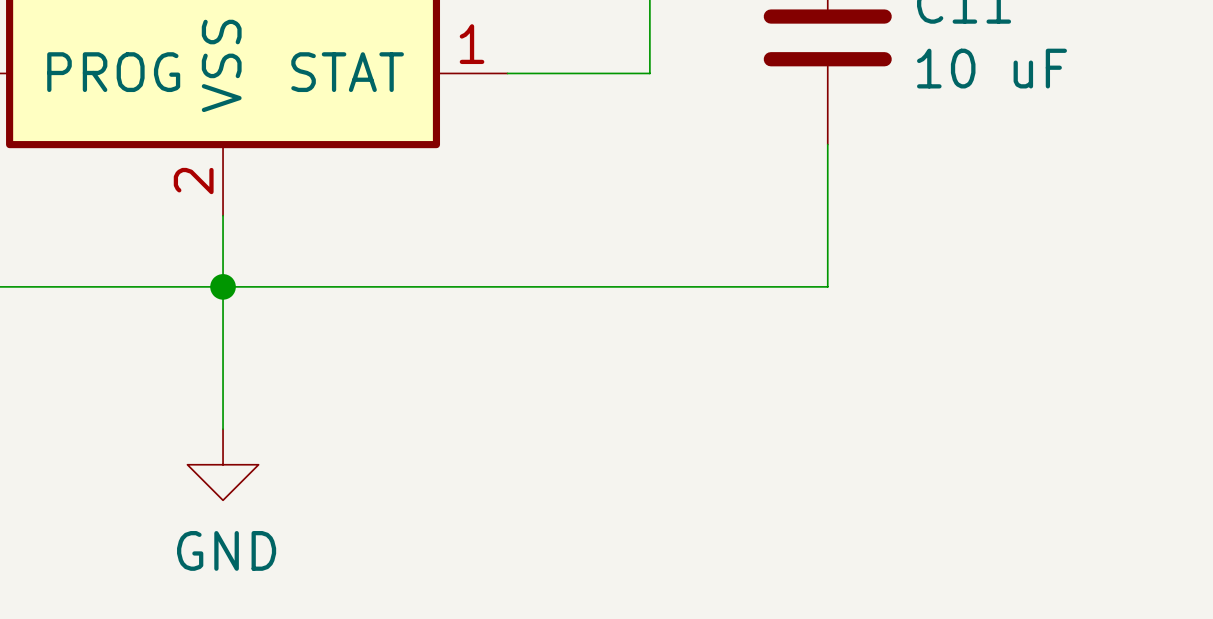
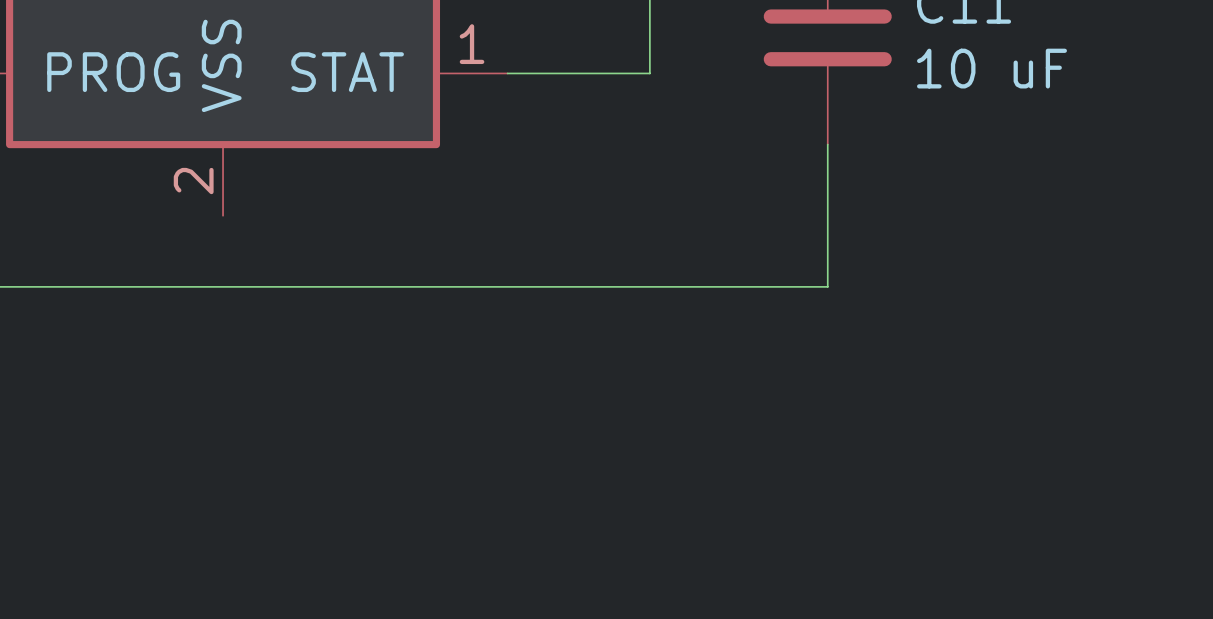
wire: (223, 215) (223, 429) -> none
junction: (223, 286) -> none
power symbol: GND (223, 464) -> none

